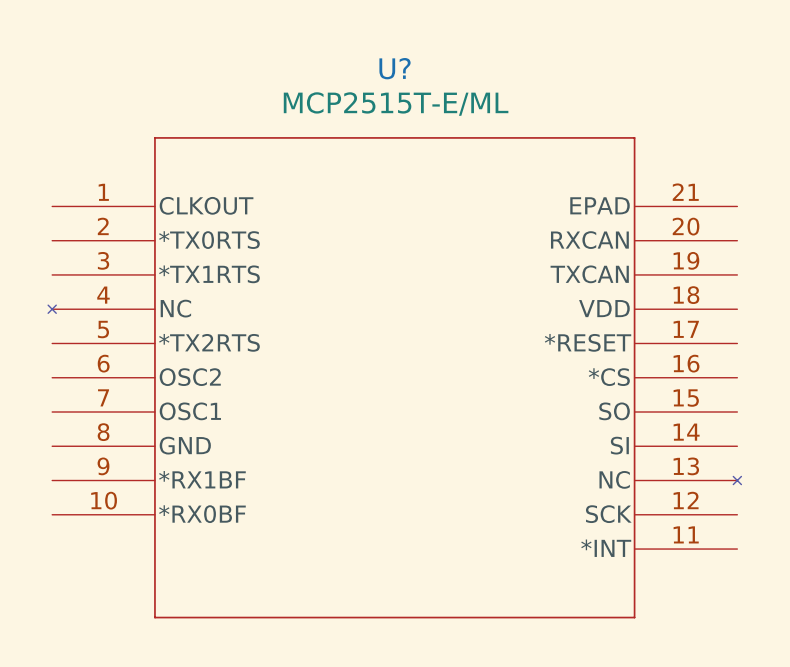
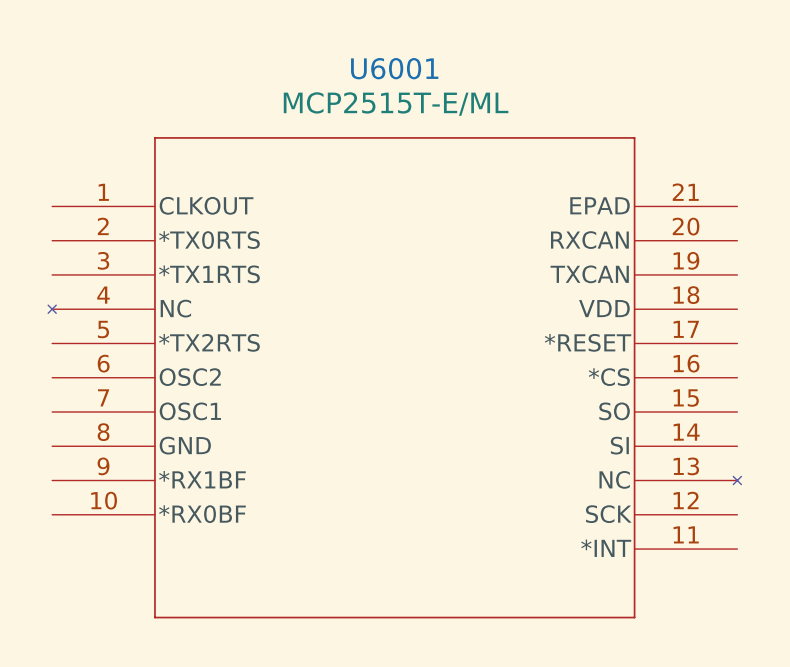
U? name: U? (395, 68) -> U6001 (394, 68)

